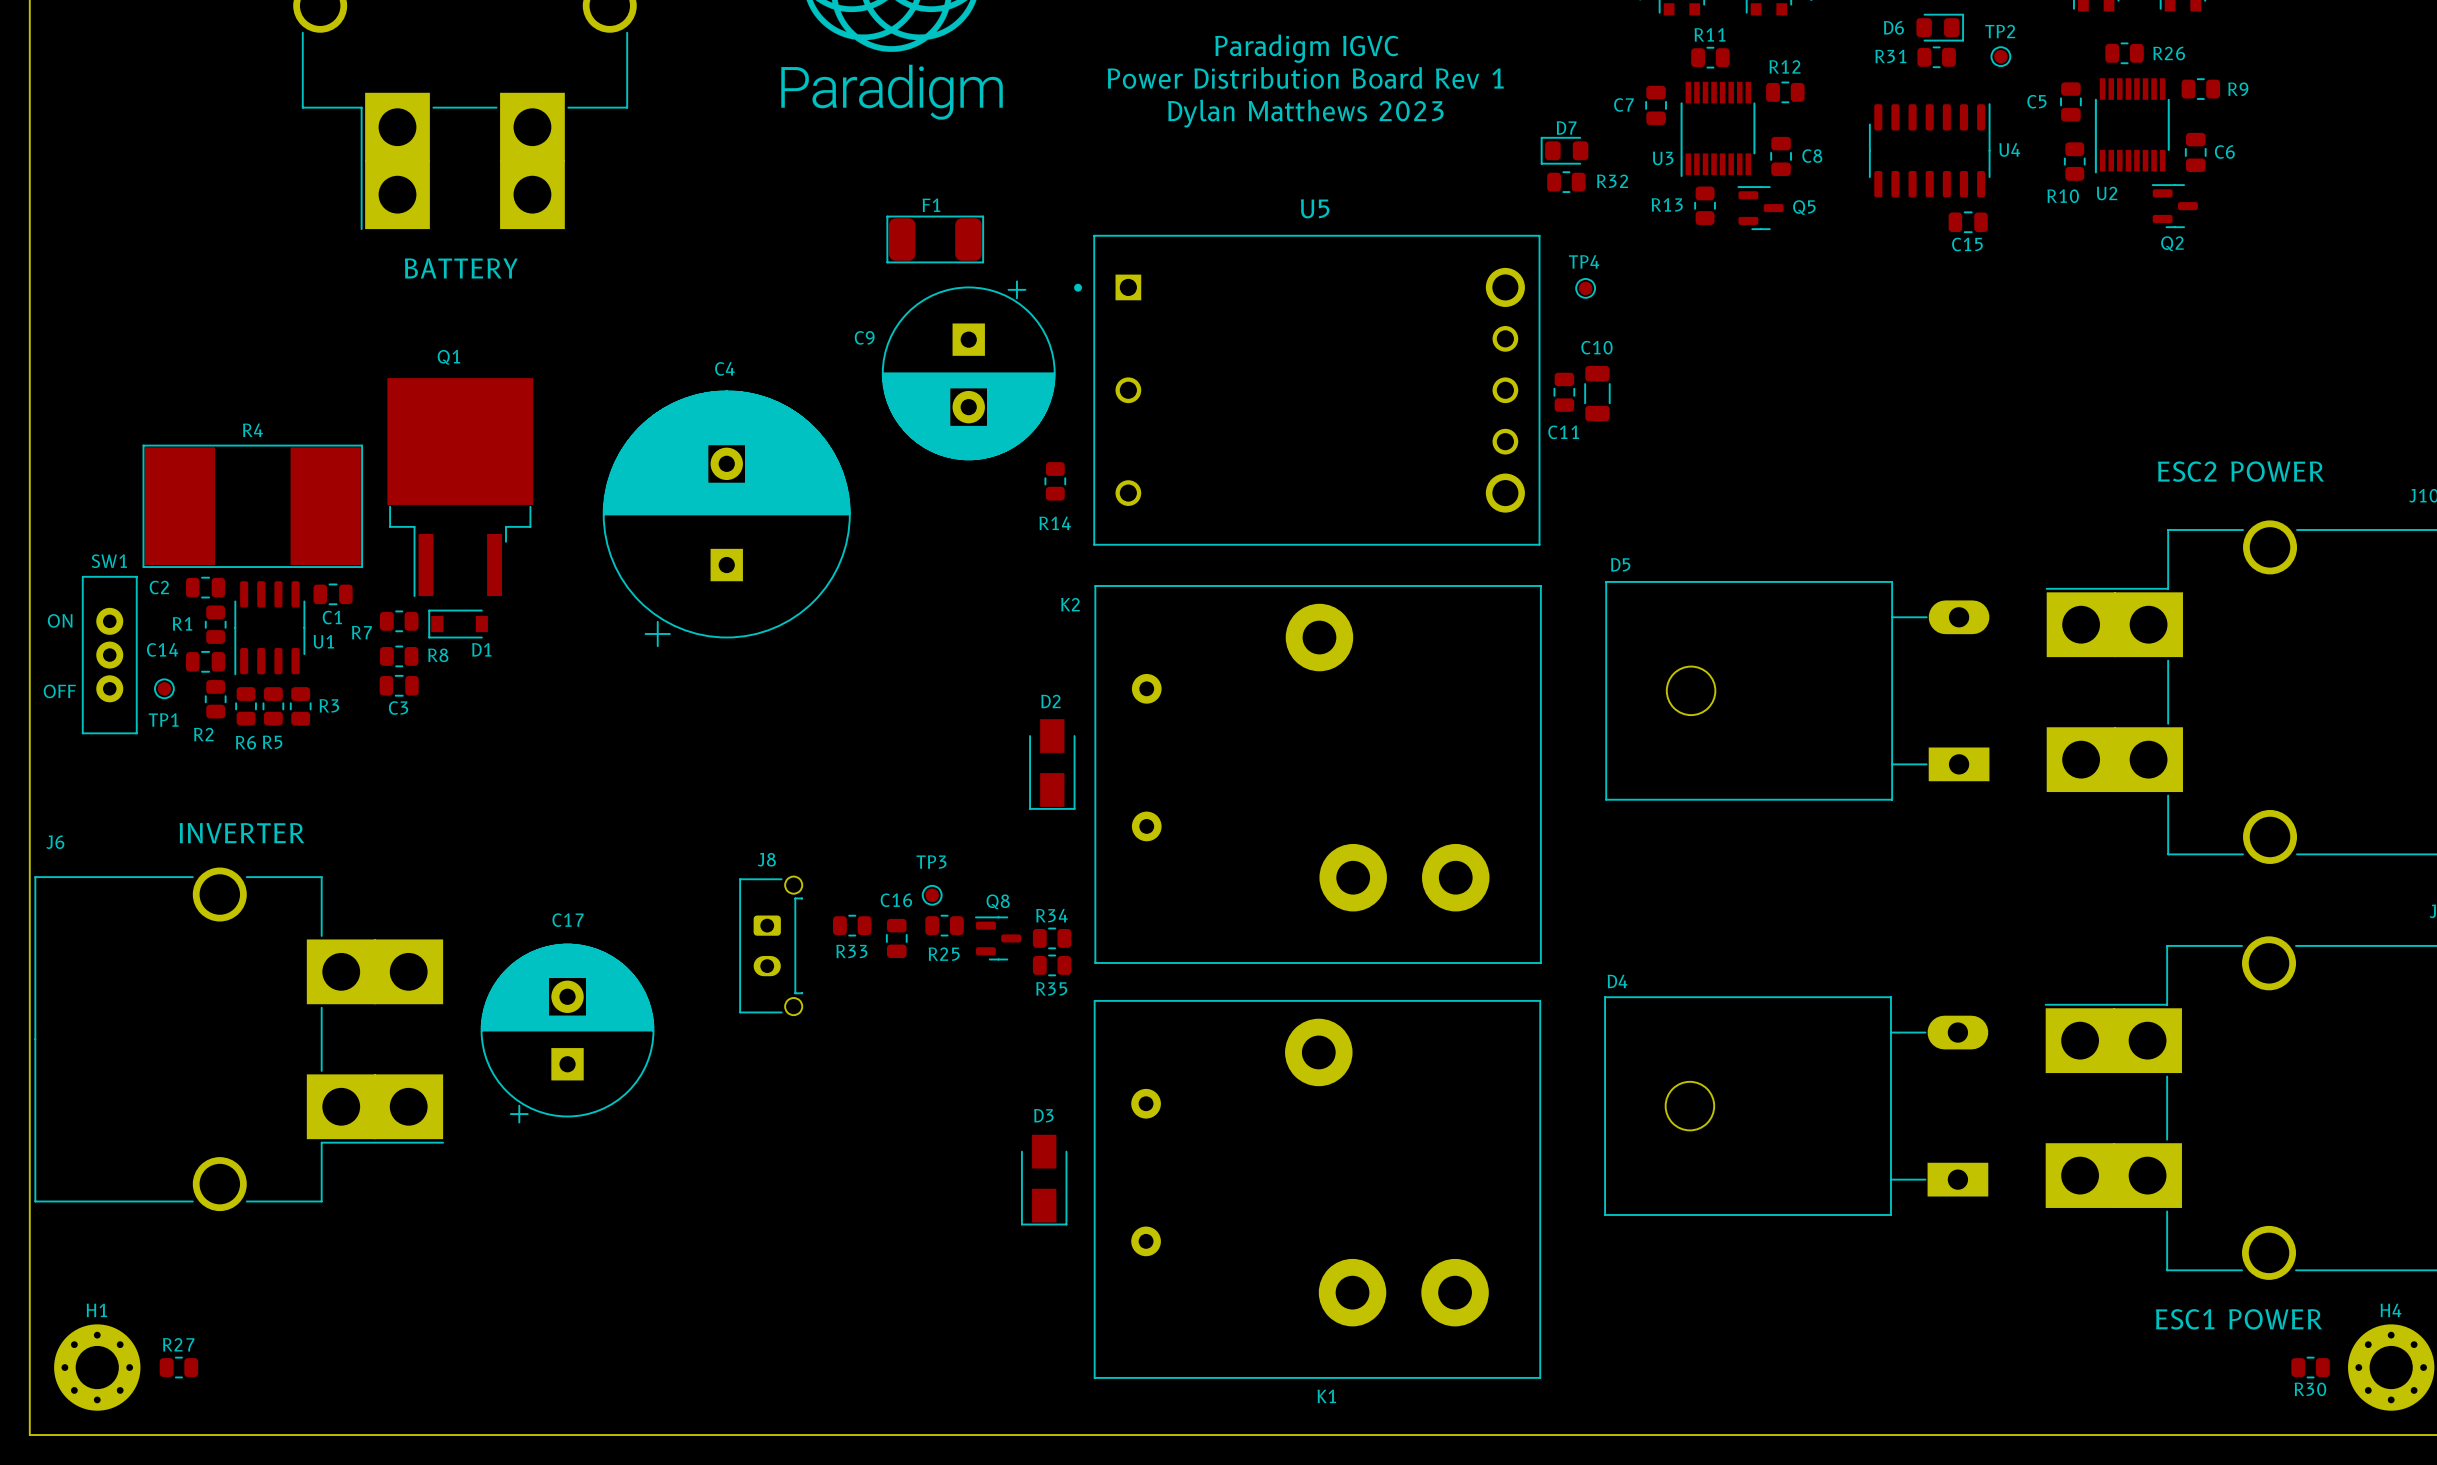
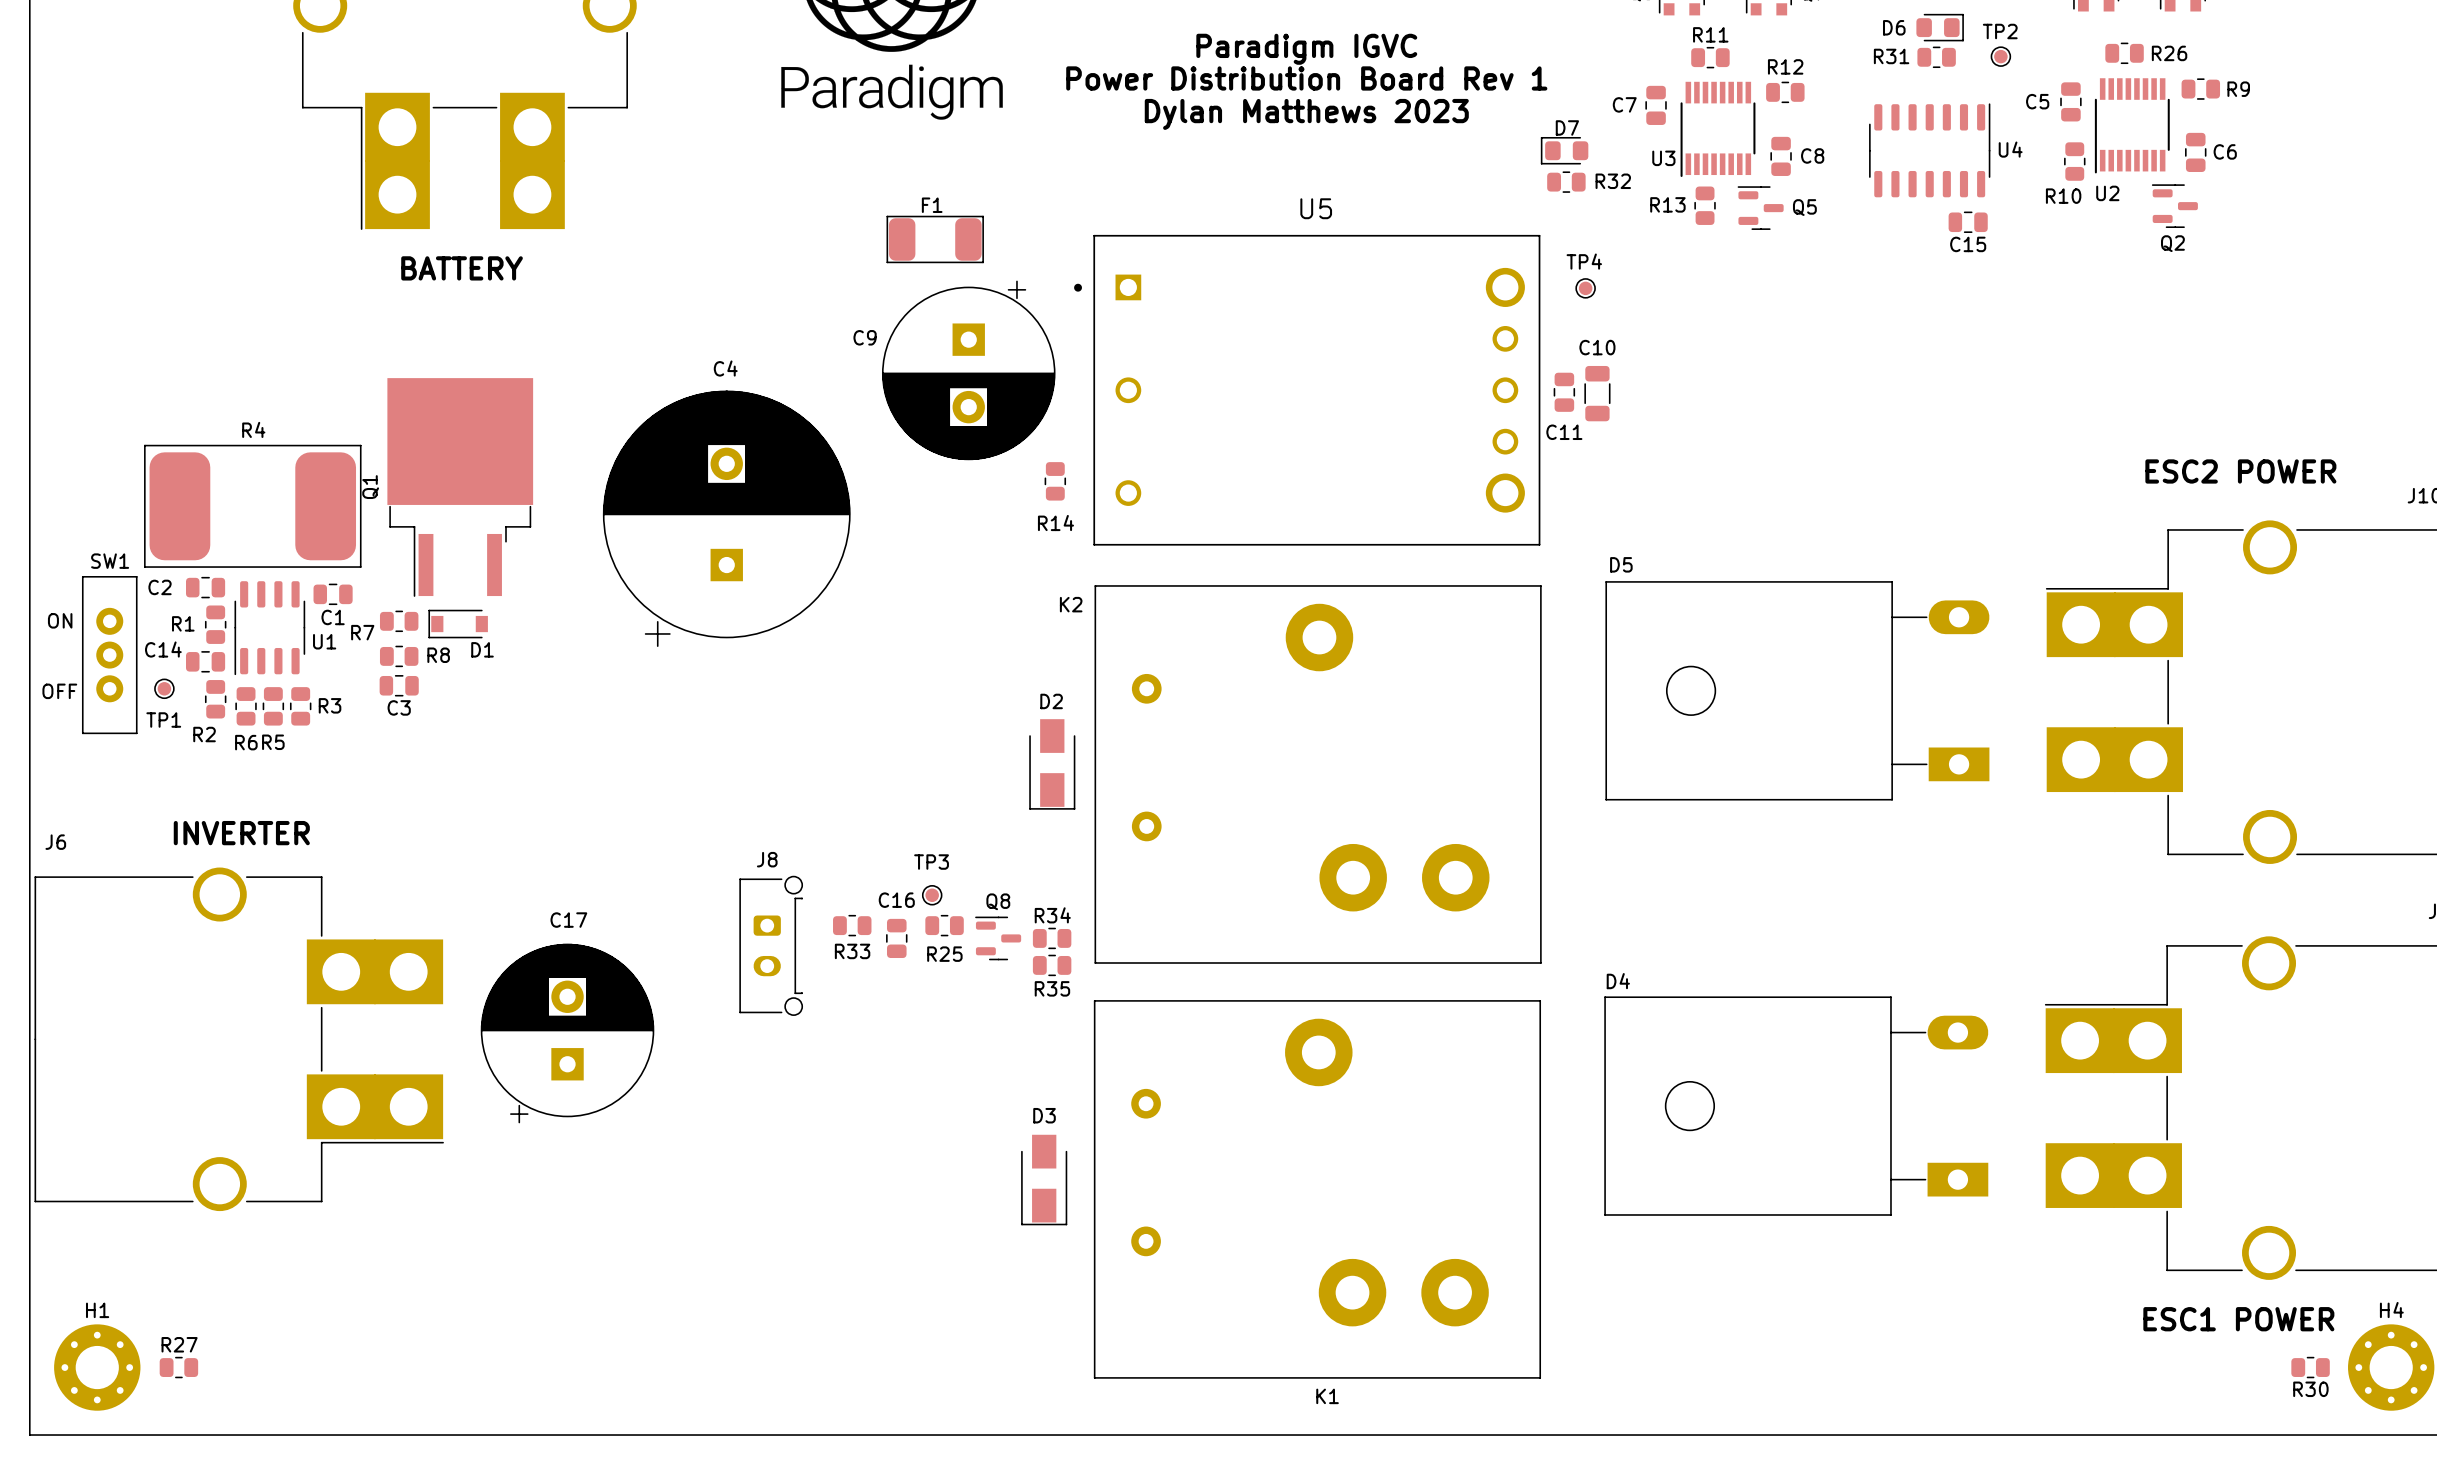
Q1 name rotation: 0° (448, 357) -> 90° counterclockwise (370, 487)
Q1 name position: Q1 (448, 357) -> Q1 (370, 487)
R4 footprint: [142, 444, 363, 568] -> [144, 444, 362, 568]

